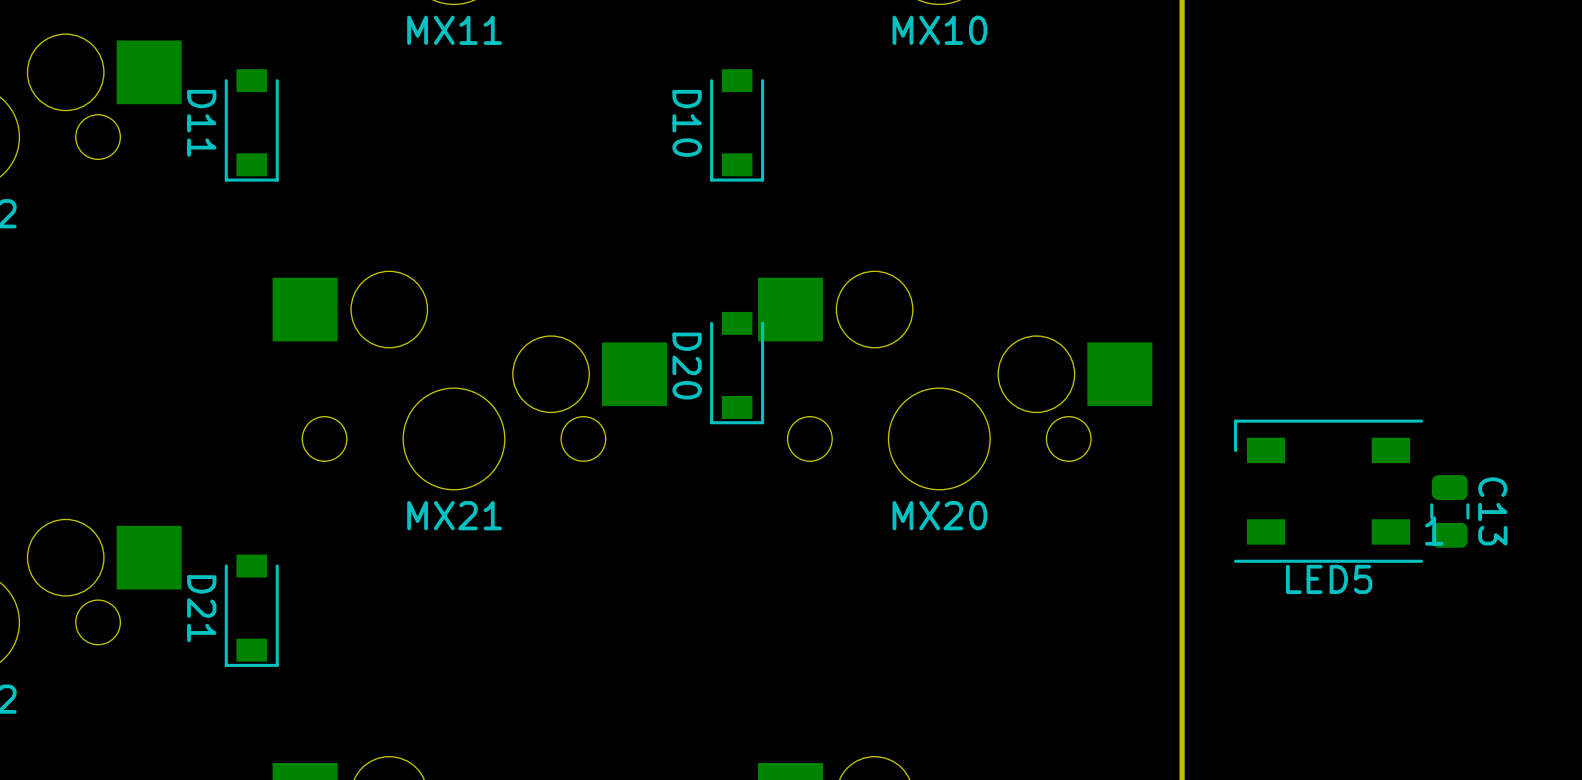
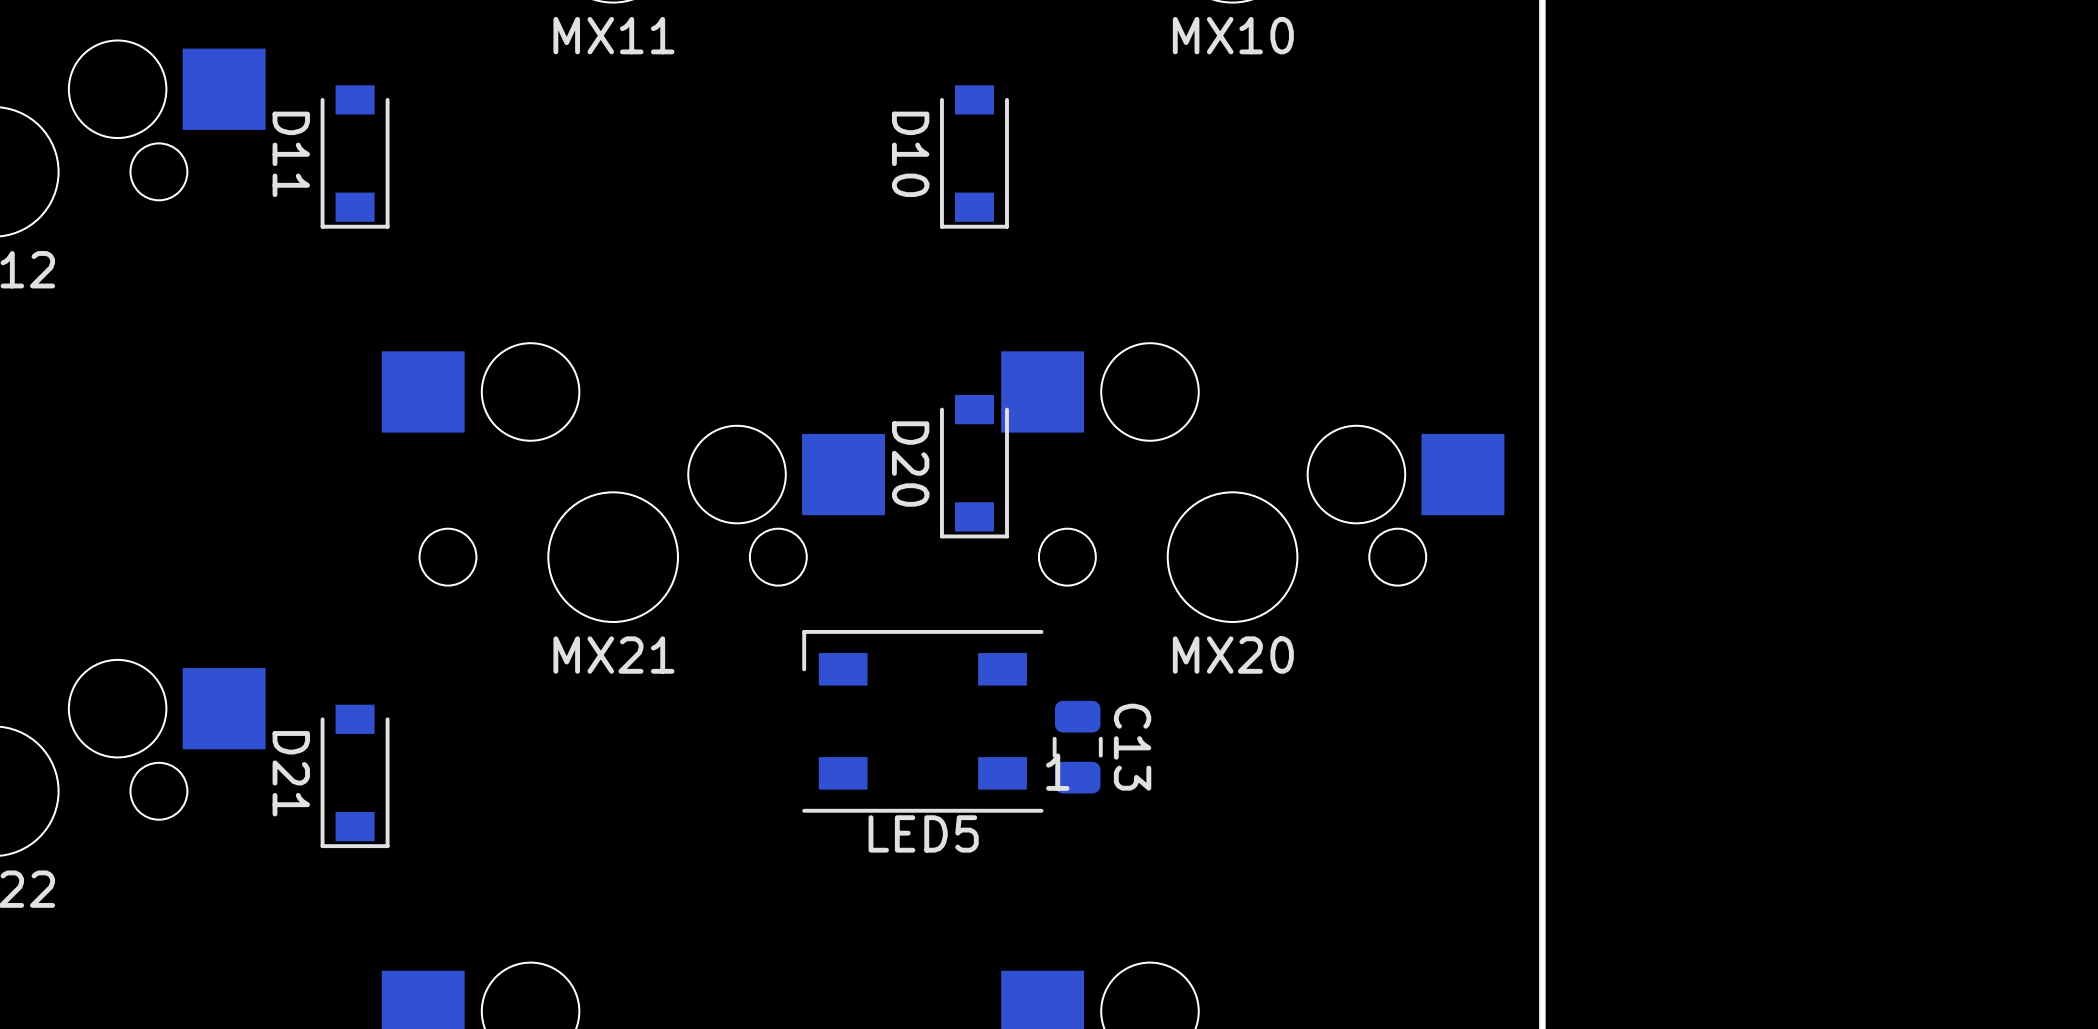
LED5 position: (1328, 491) -> (922, 721)
C13 position: (1449, 511) -> (1077, 747)

